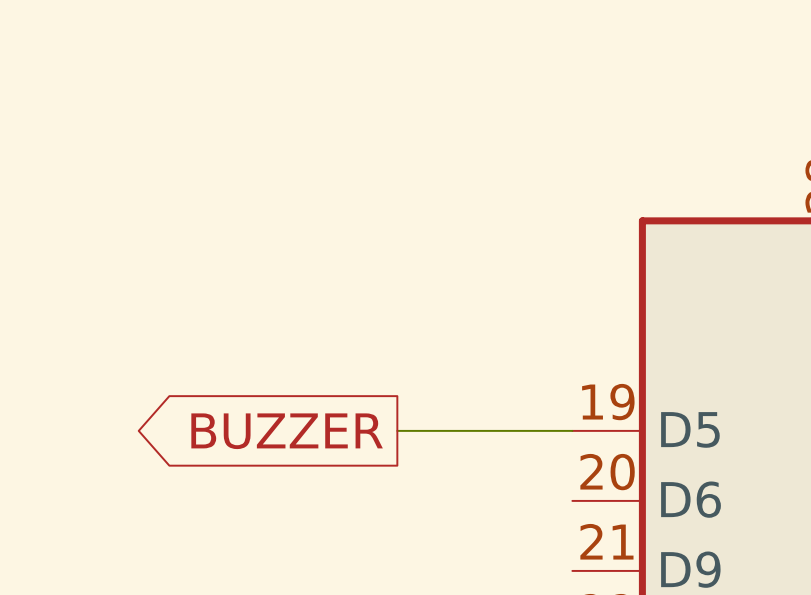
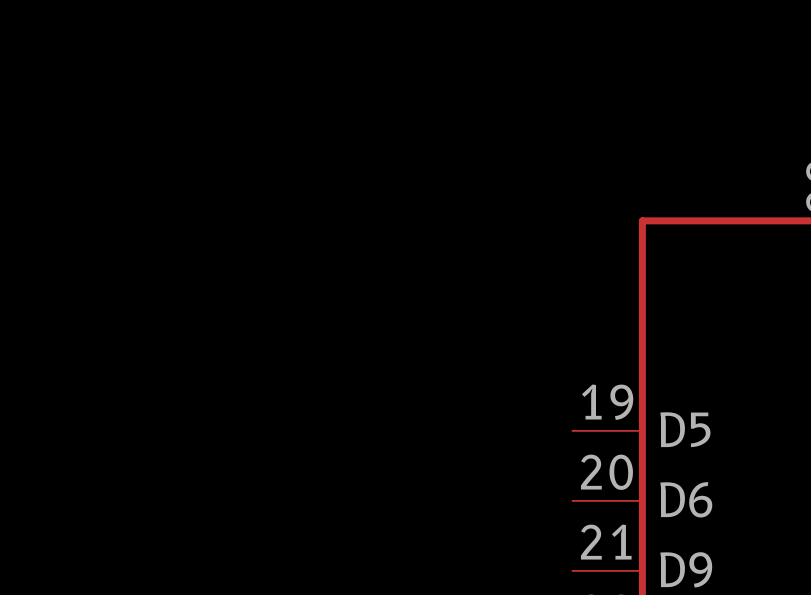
wire: (397, 430) (572, 430) -> none
global label: BUZZER (287, 431) -> none

